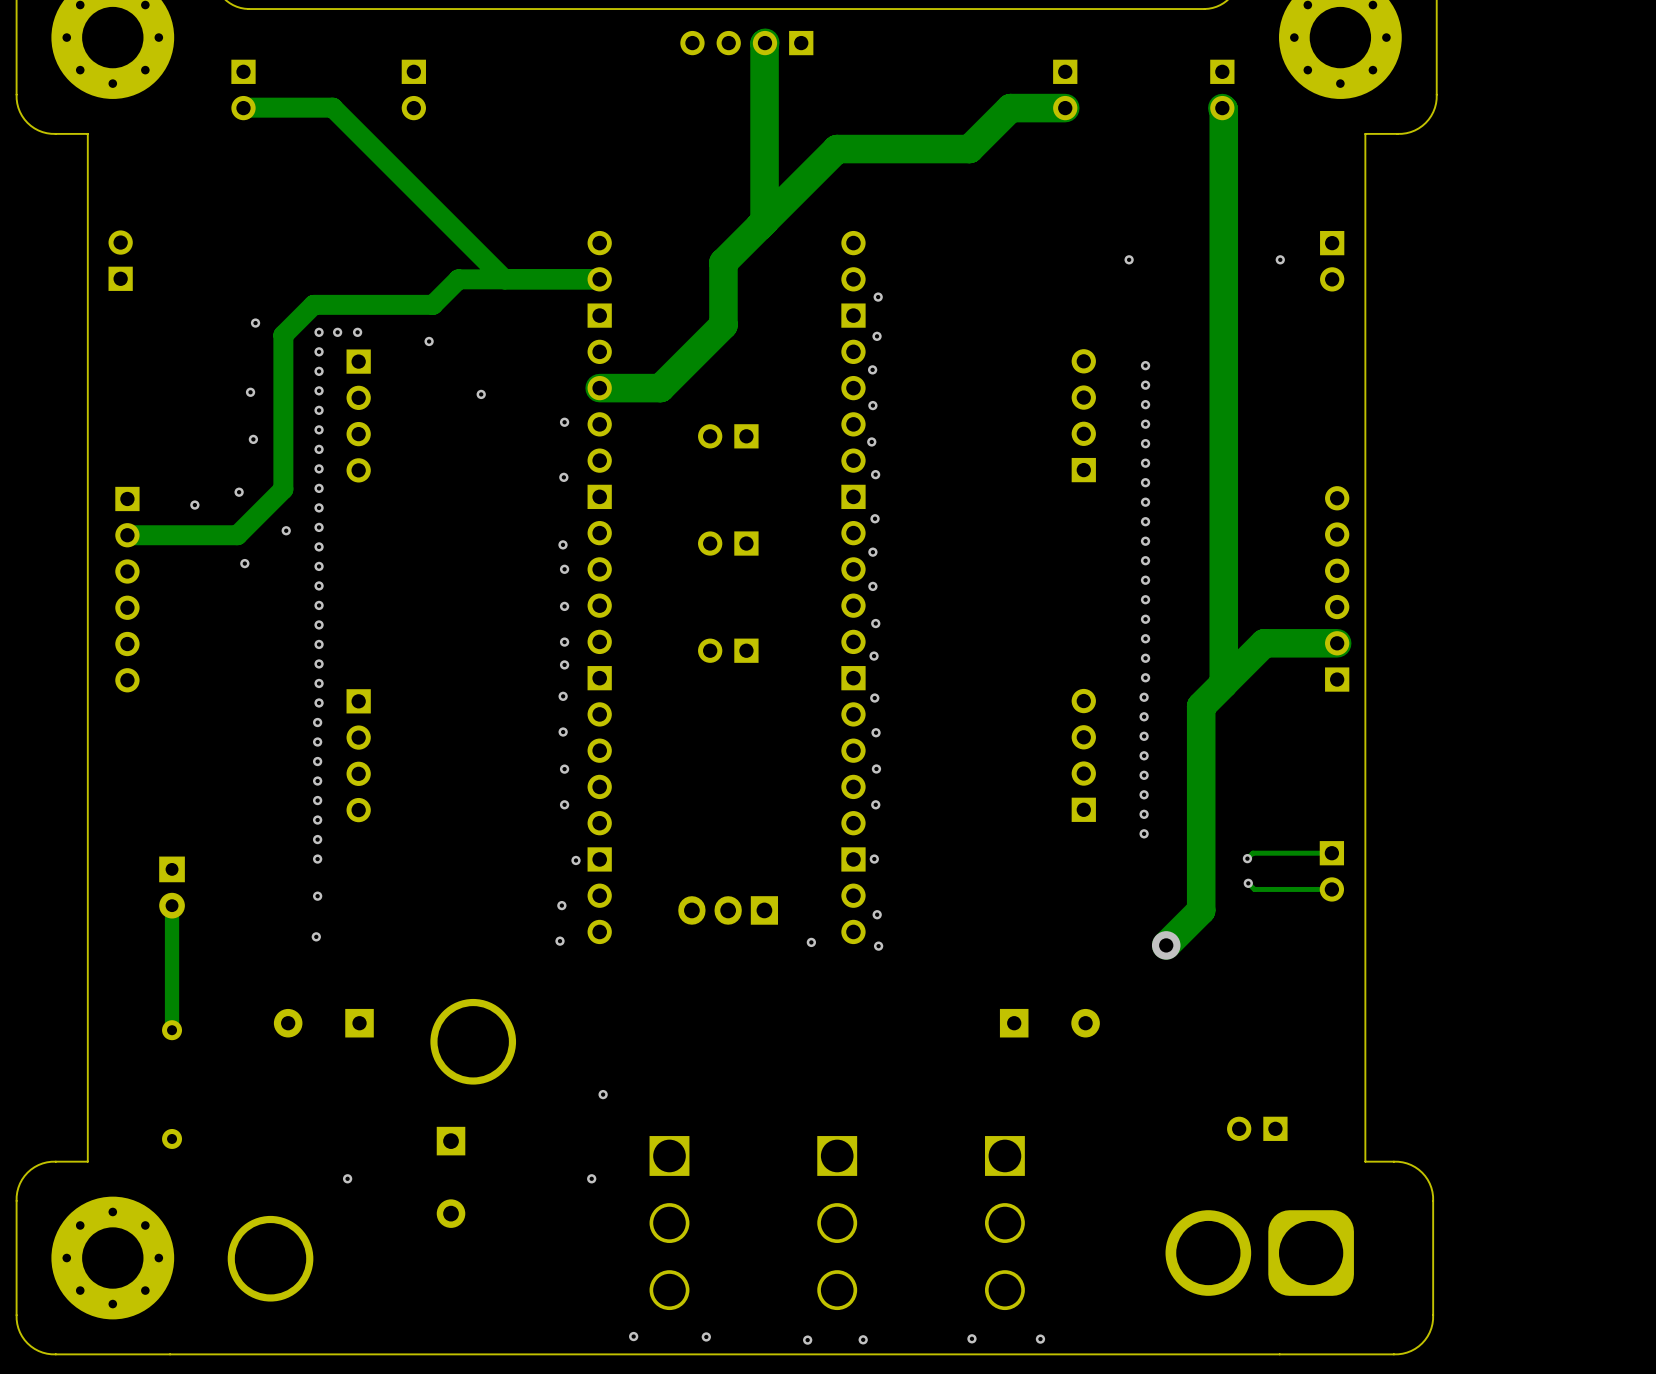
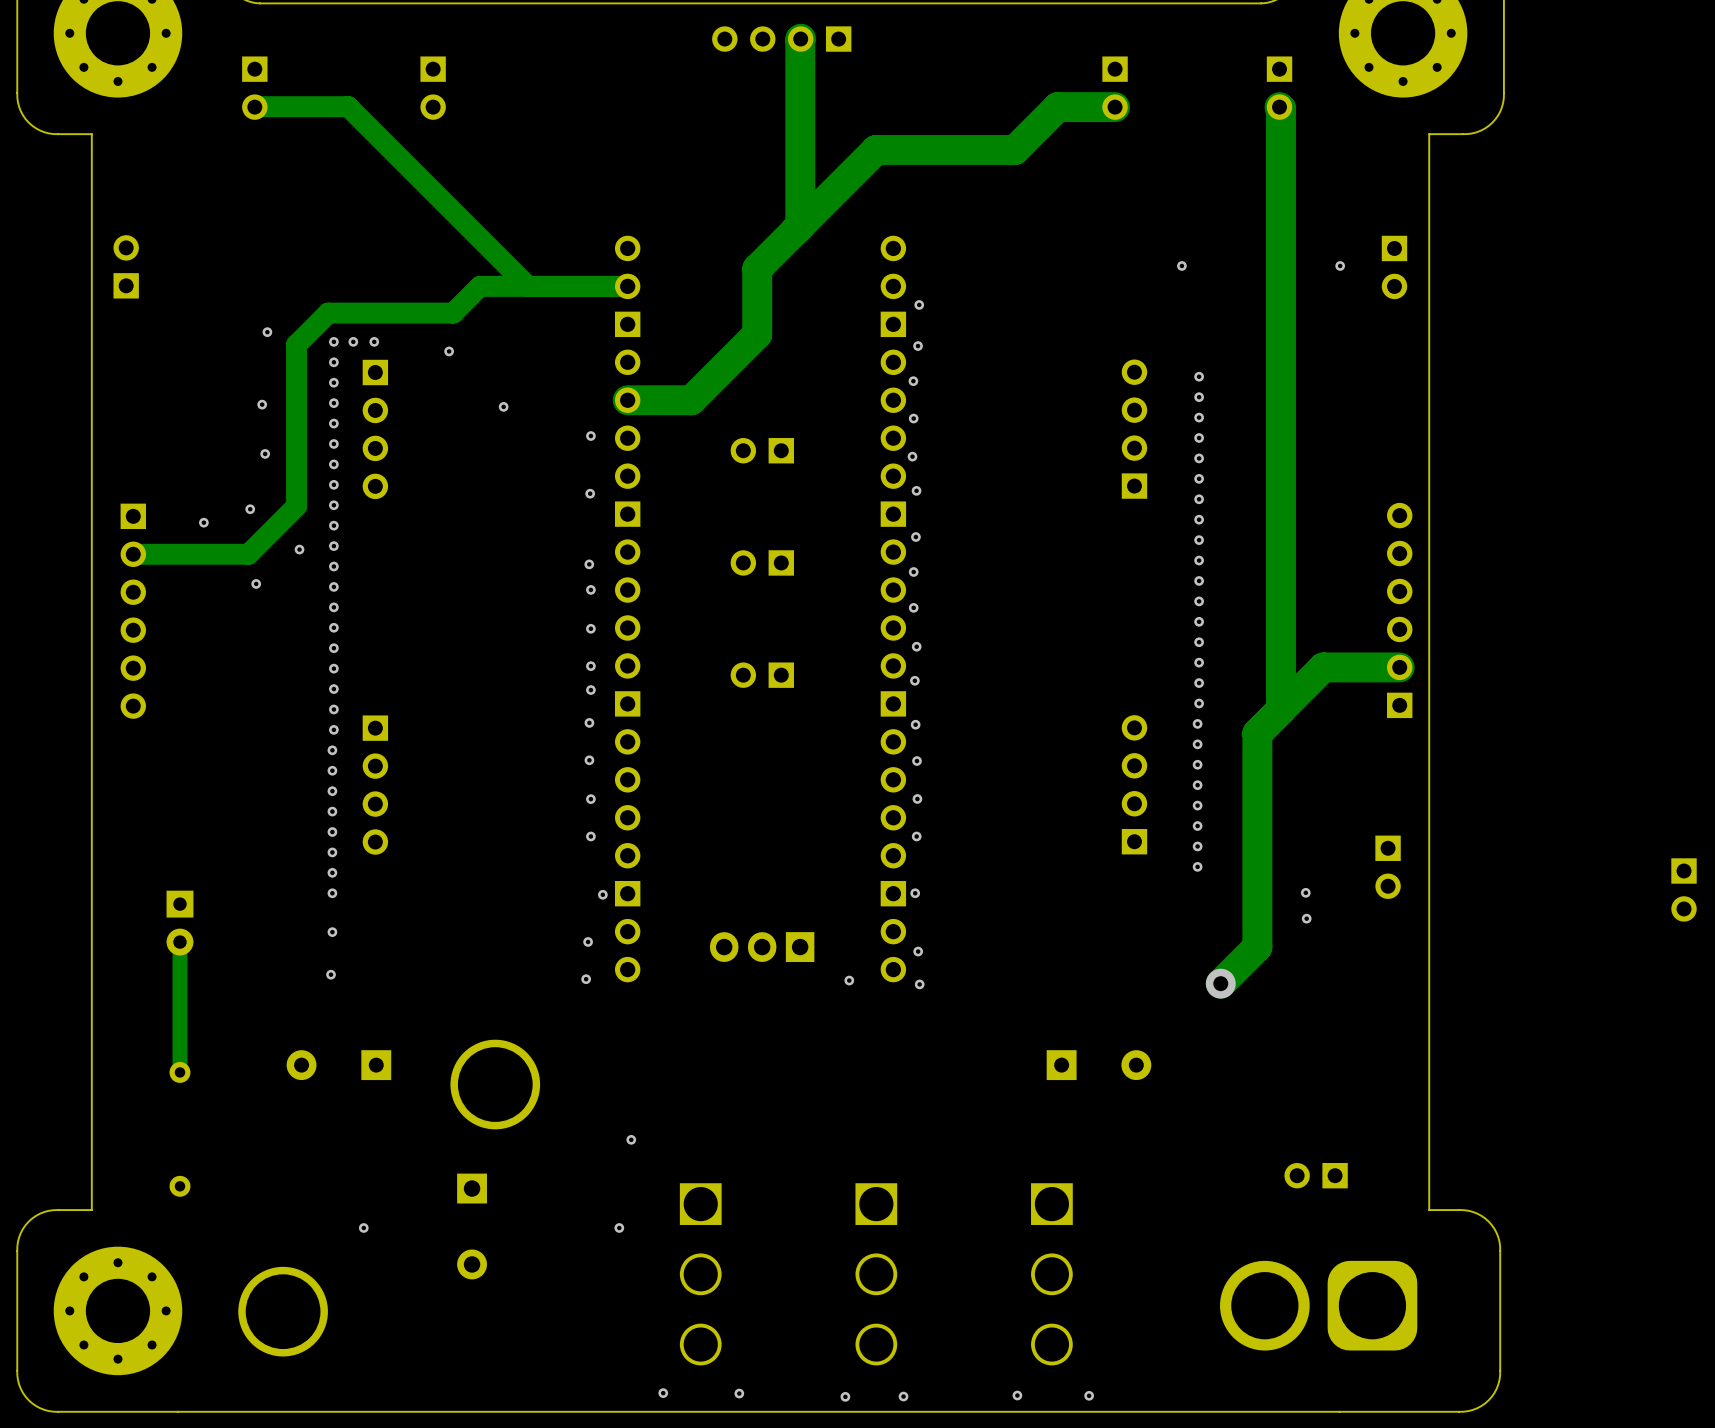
track: (1331, 853) (1252, 853) (1247, 858) -> none
part: none -> (1684, 889)
part position: (1331, 871) -> (1388, 867)
track: (1248, 883) (1254, 889) (1331, 889) -> none

